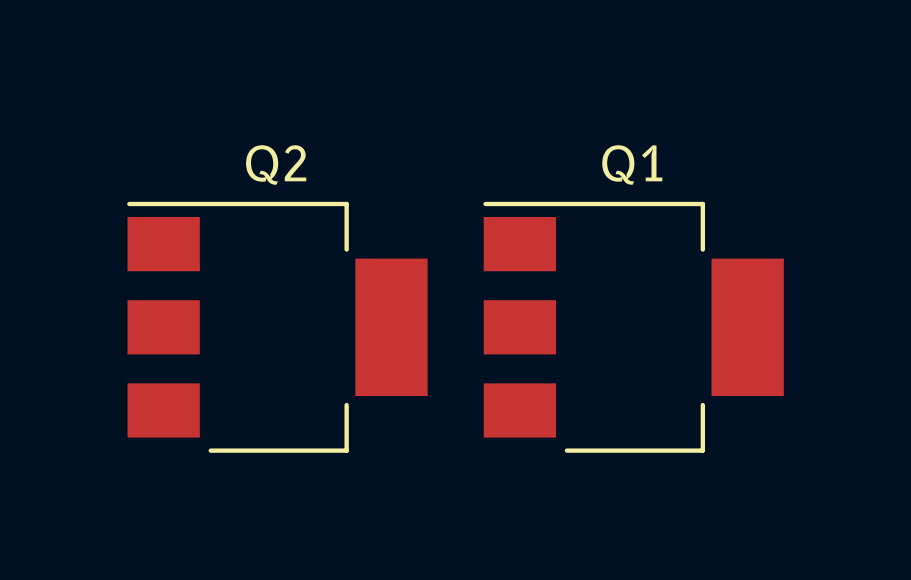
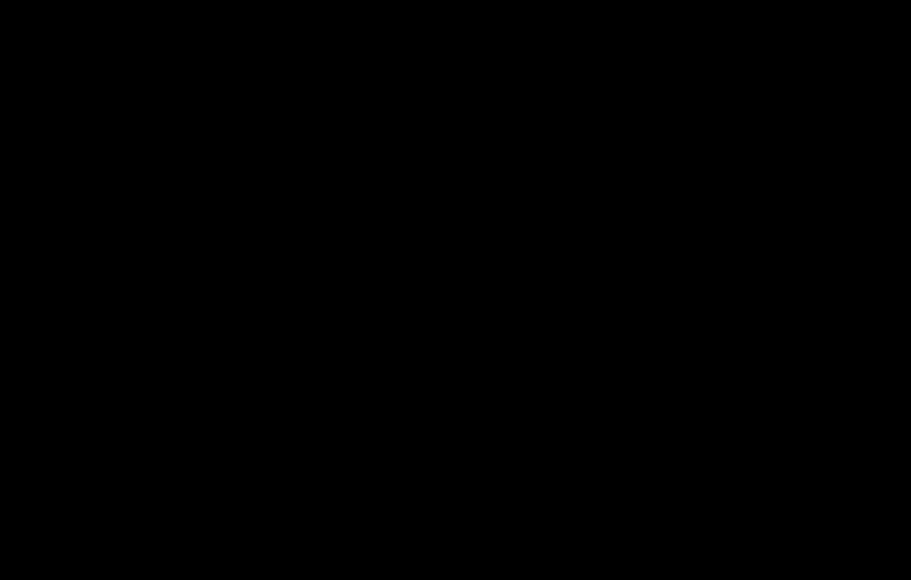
Q2: (277, 327) -> none
Q1: (633, 327) -> none

